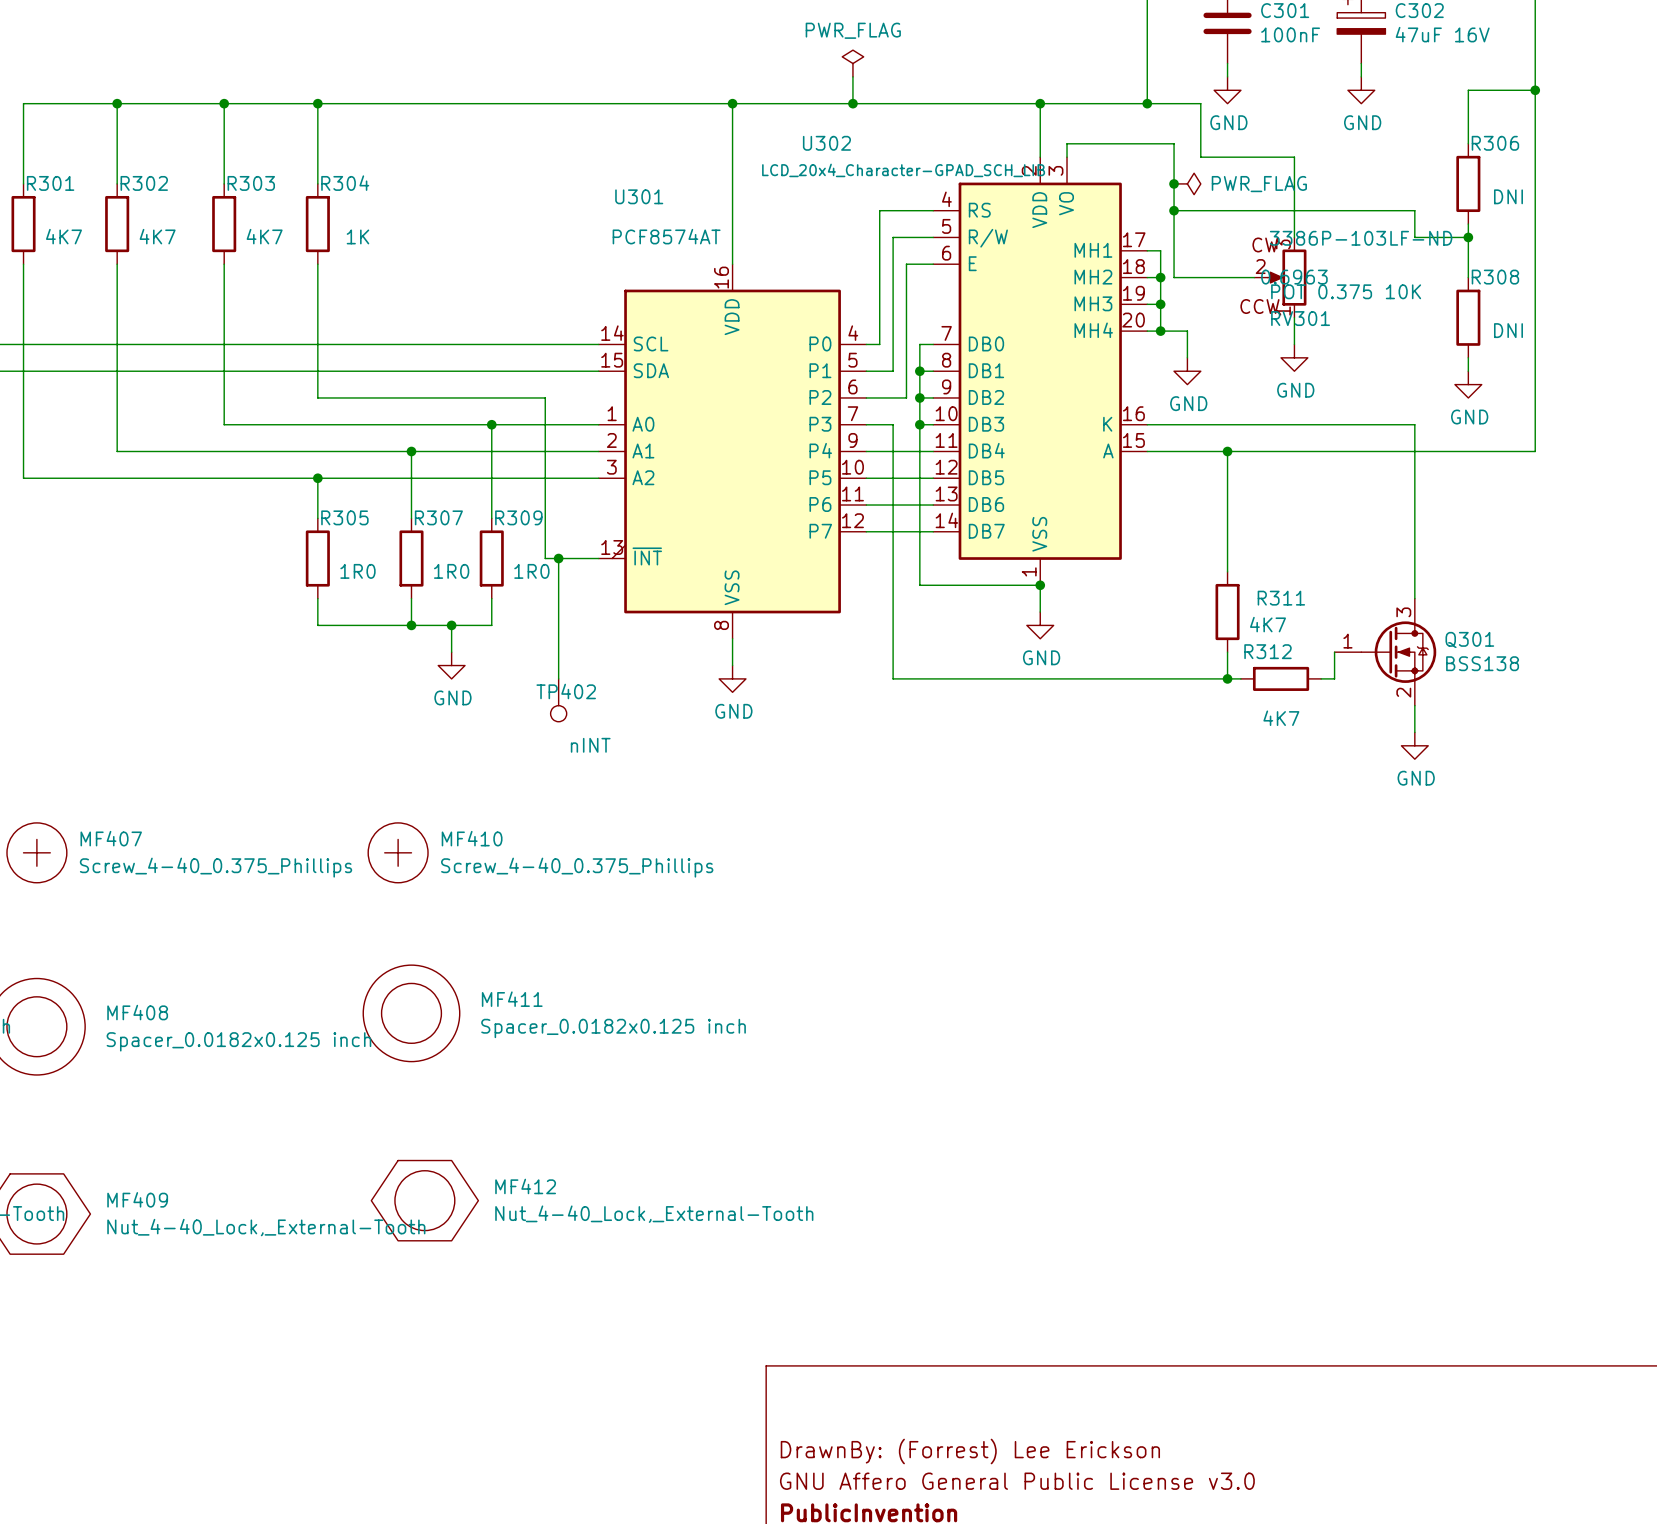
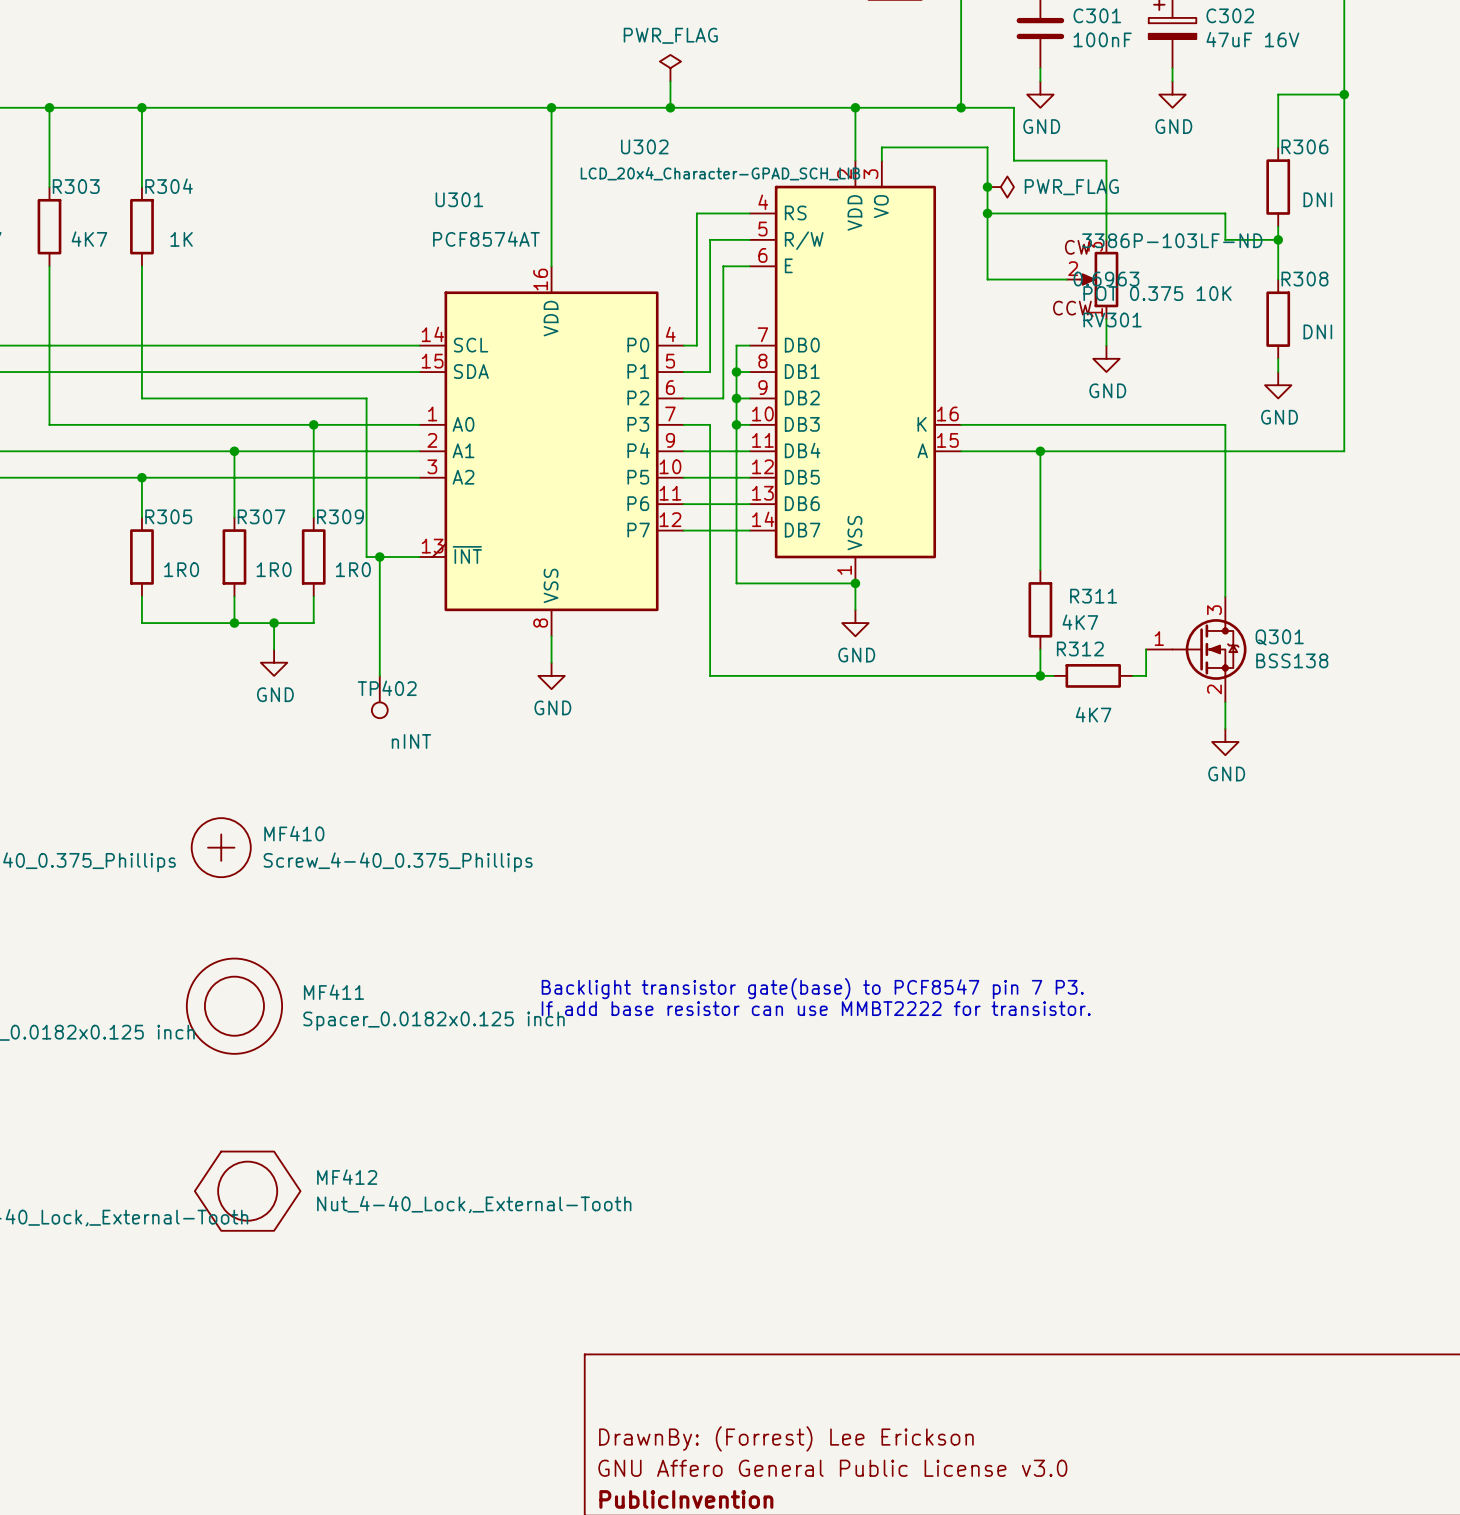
U302 symbol: [933, 157, 1148, 586] -> [749, 160, 962, 584]
wire: (1147, 250) (1160, 250) (1160, 331) -> none
wire: (1147, 277) (1160, 277) -> none
junction: (1160, 277) -> none
wire: (1147, 304) (1160, 304) -> none
junction: (1160, 304) -> none
wire: (1147, 331) (1187, 331) (1187, 357) -> none
junction: (1160, 331) -> none
power symbol: GND (1187, 371) -> none
text: none -> Backlight transistor gate(base) to PCF8547 pin 7 P3. (812, 988)
text: none -> If add base resistor can use MMBT2222 for transistor. (816, 1008)

